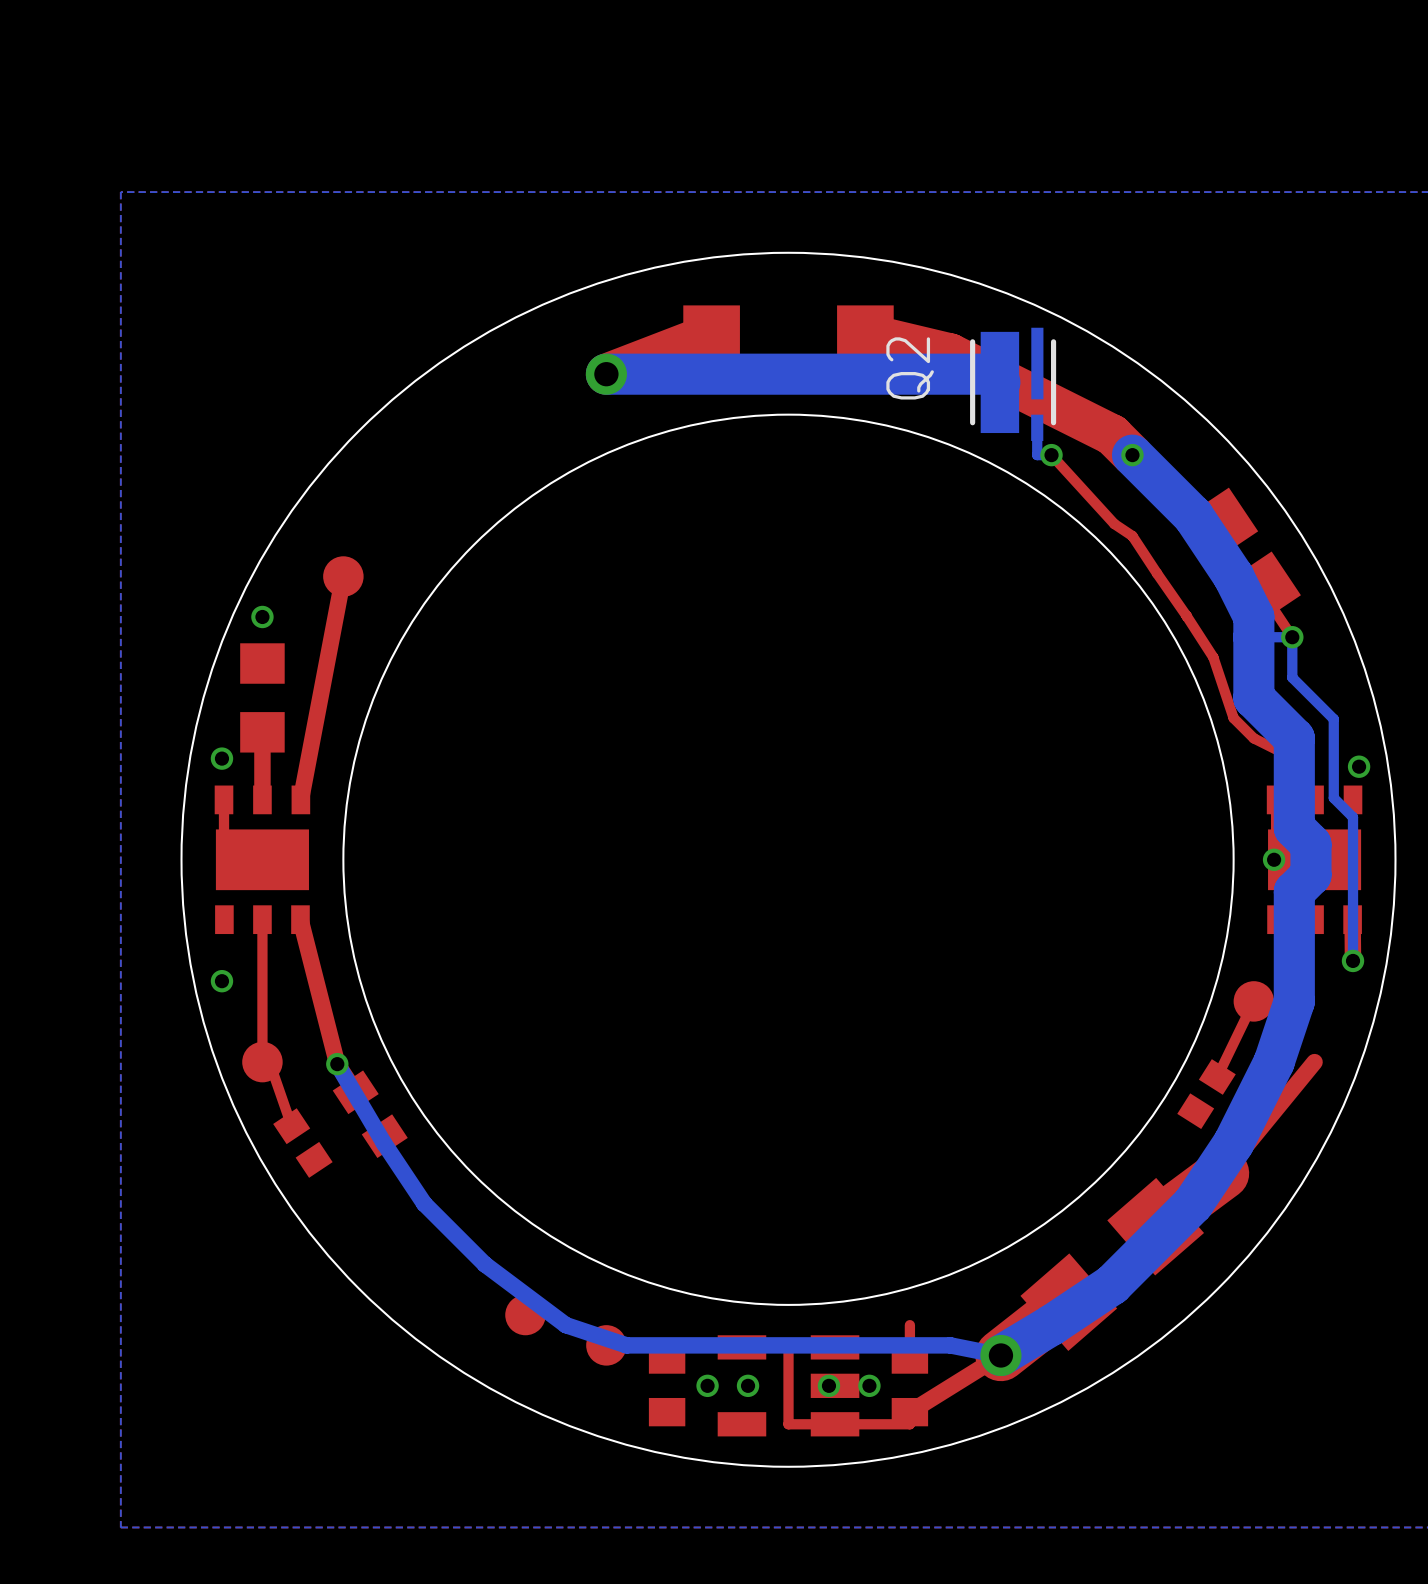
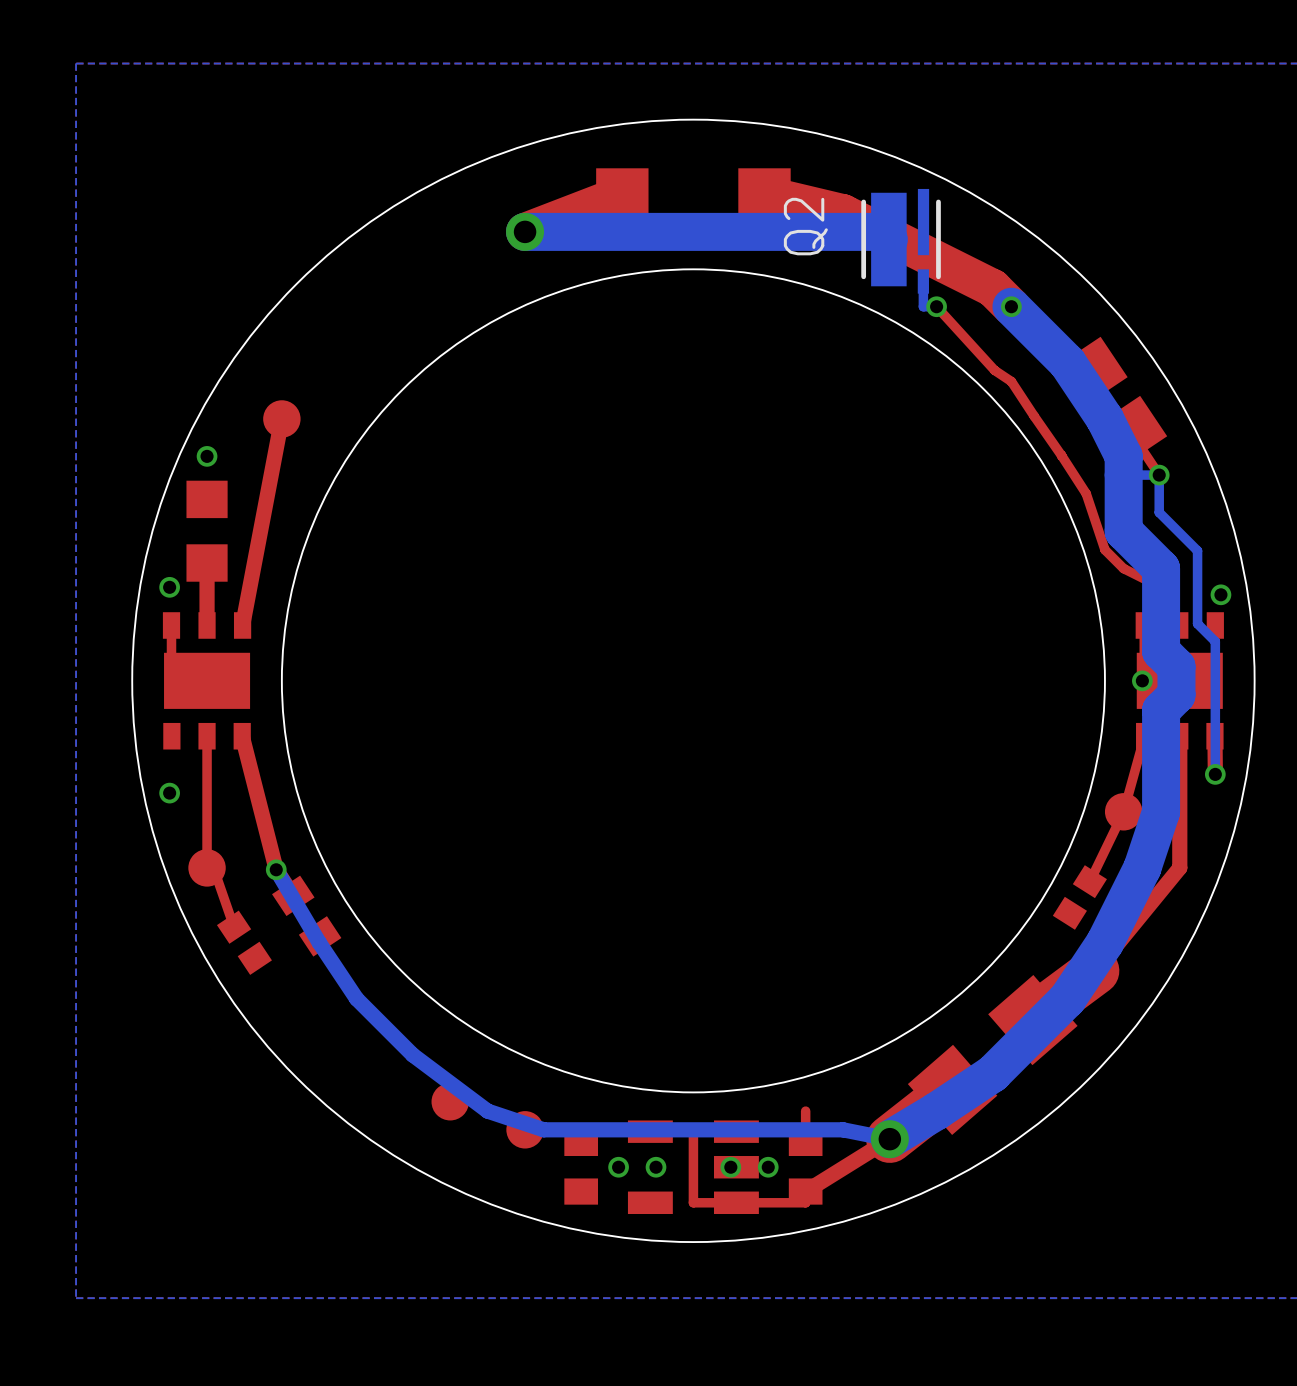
top track: none -> (1144, 736) (1123, 811)
top track: none -> (1179, 736) (1179, 867)

